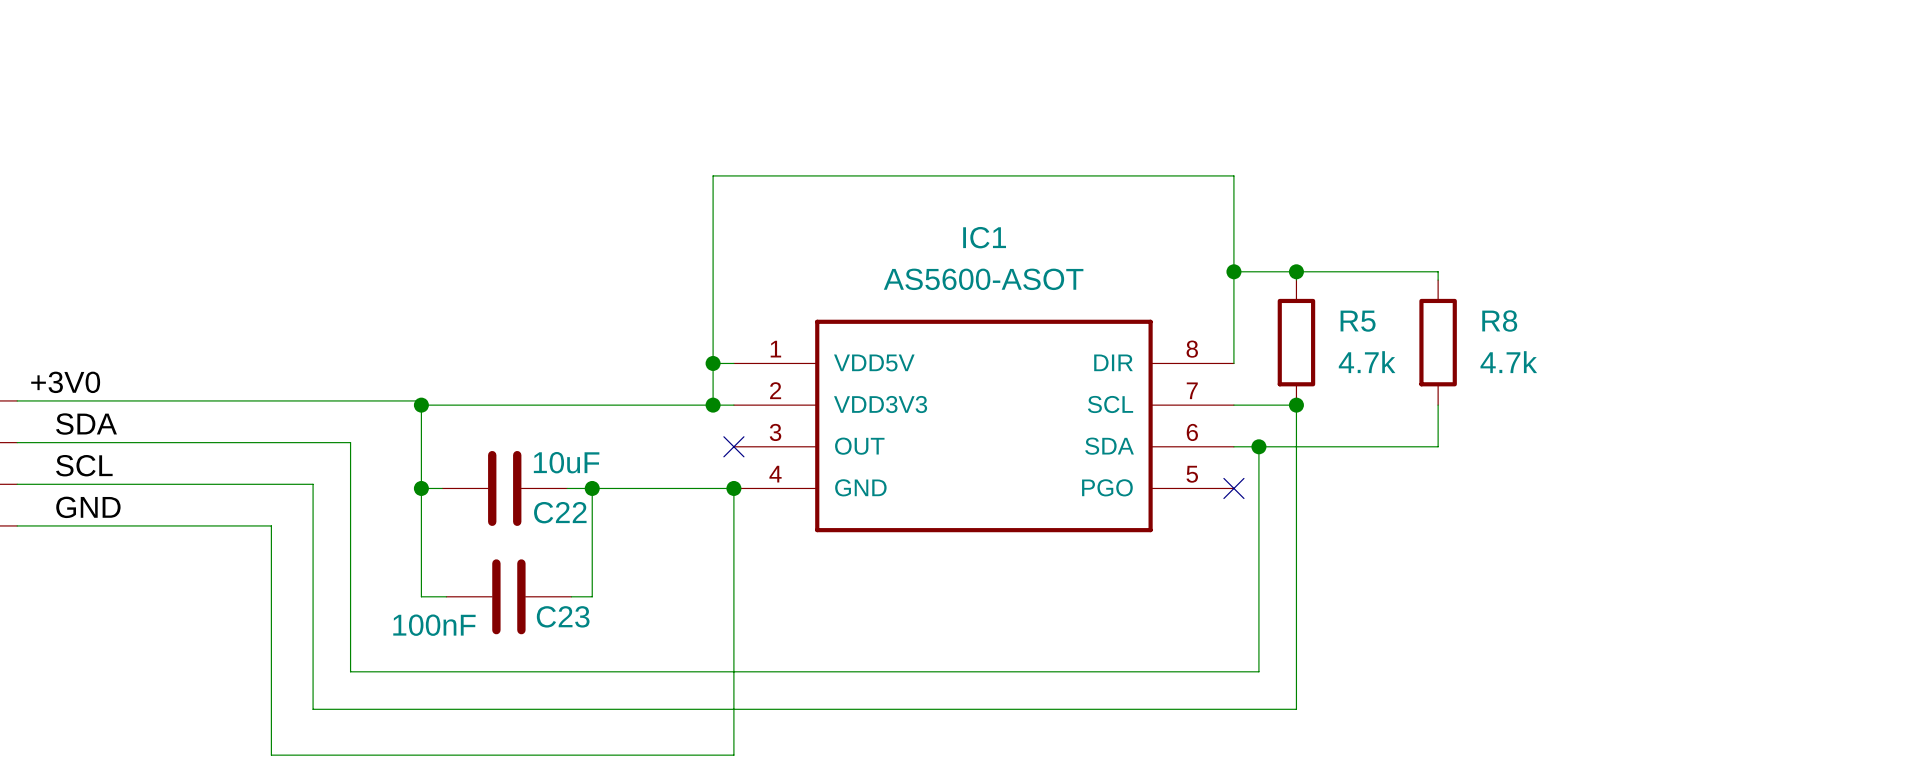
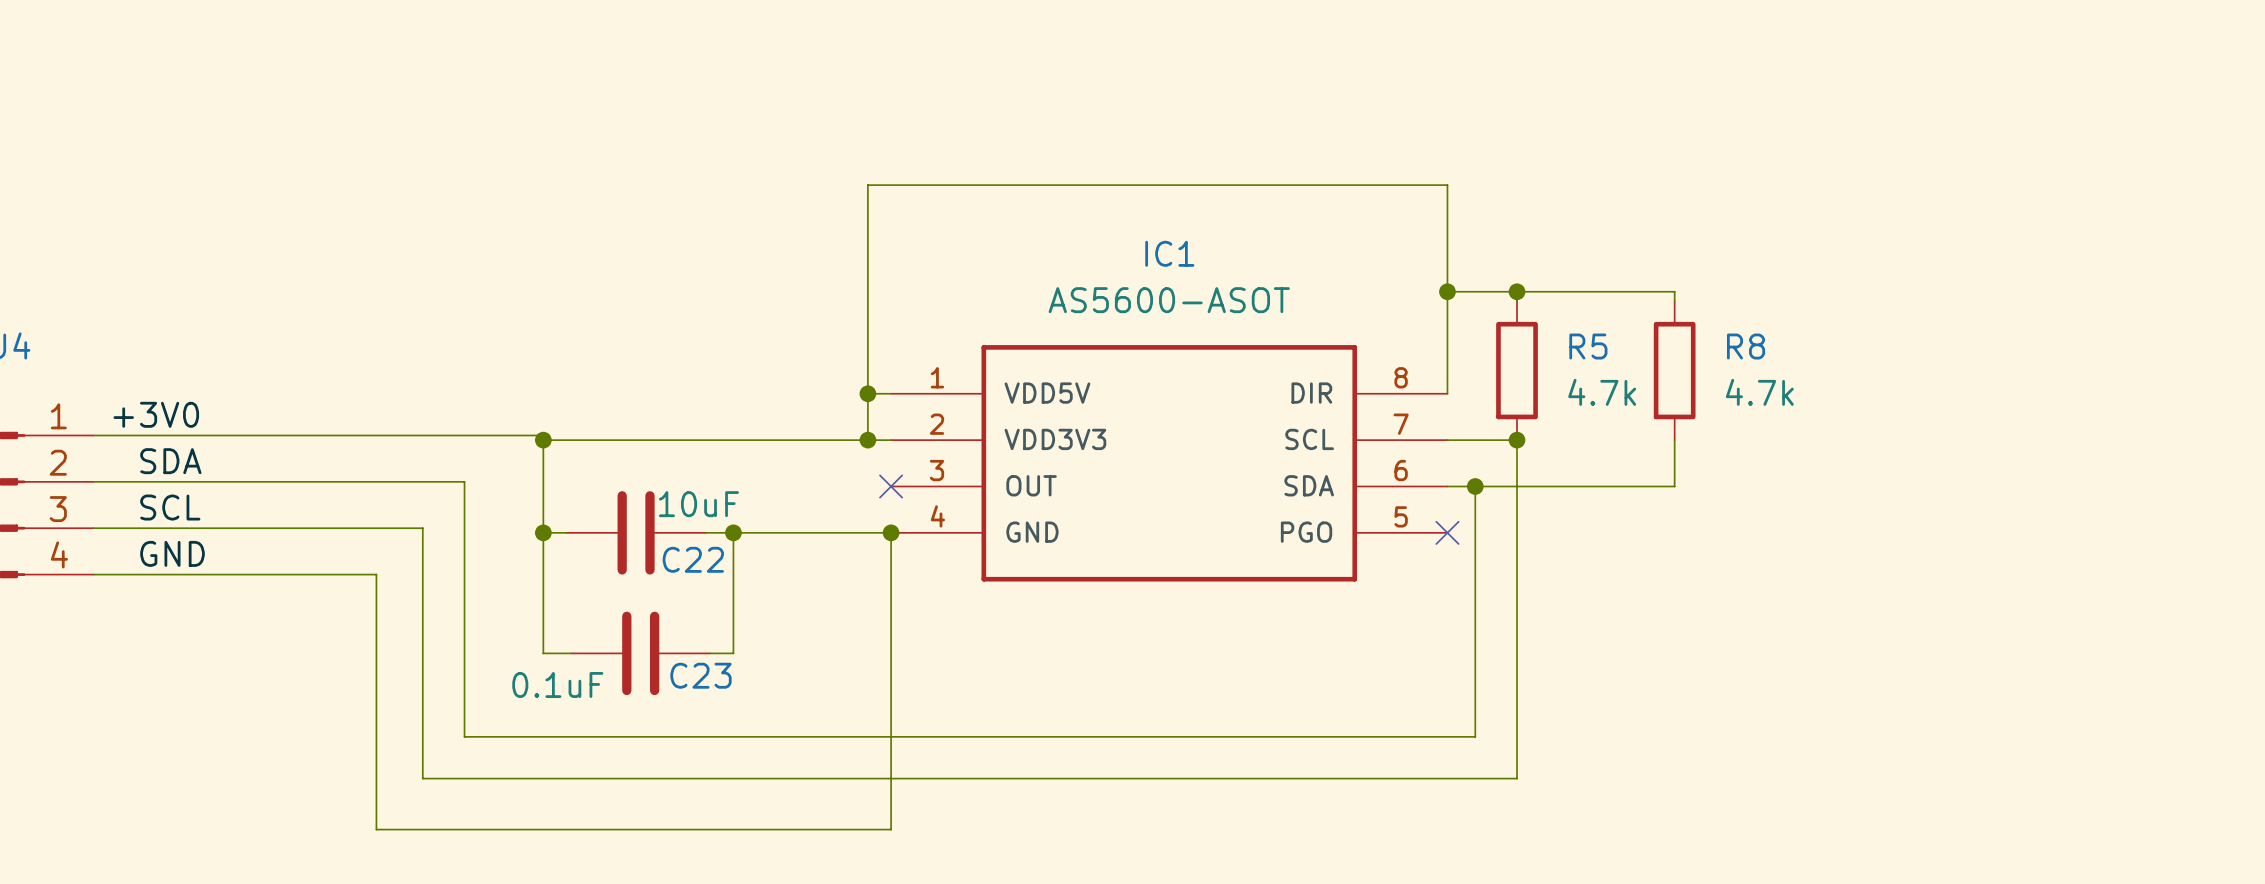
C23 value: 100nF (434, 625) -> 0.1uF (557, 684)

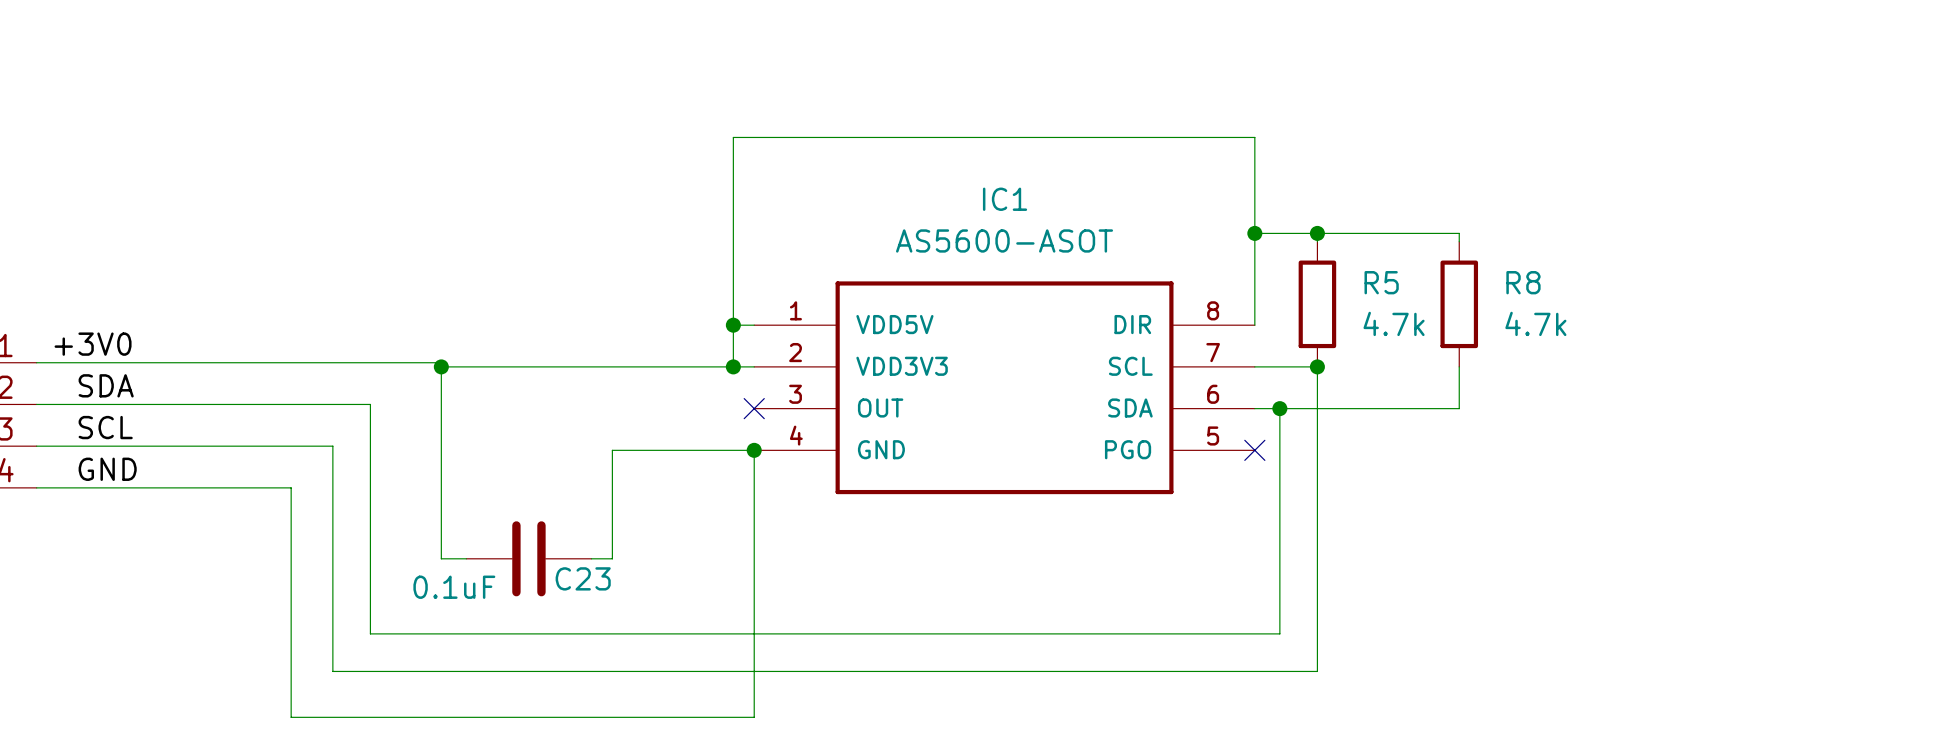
wire: (543, 532) (566, 532) -> none
junction: (543, 532) -> none
C22: 10uF (636, 532) -> none
wire: (705, 532) (733, 532) -> none
junction: (733, 532) -> none

